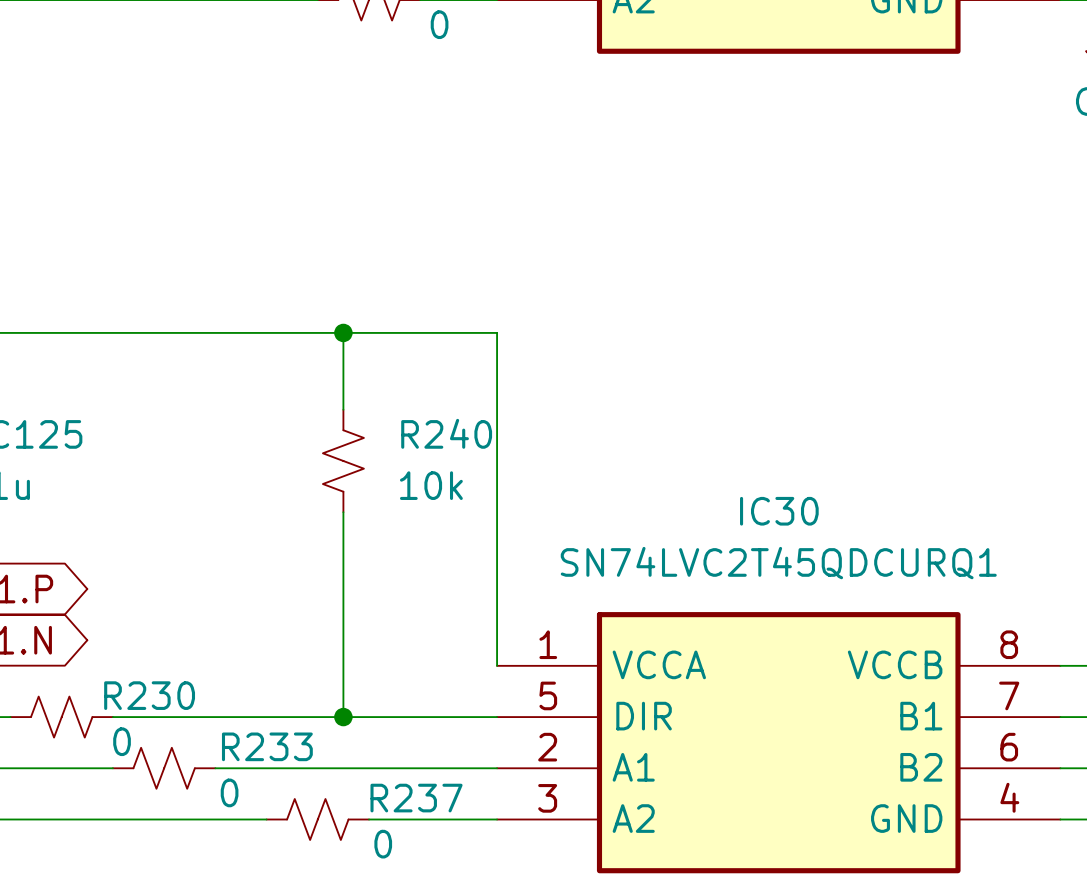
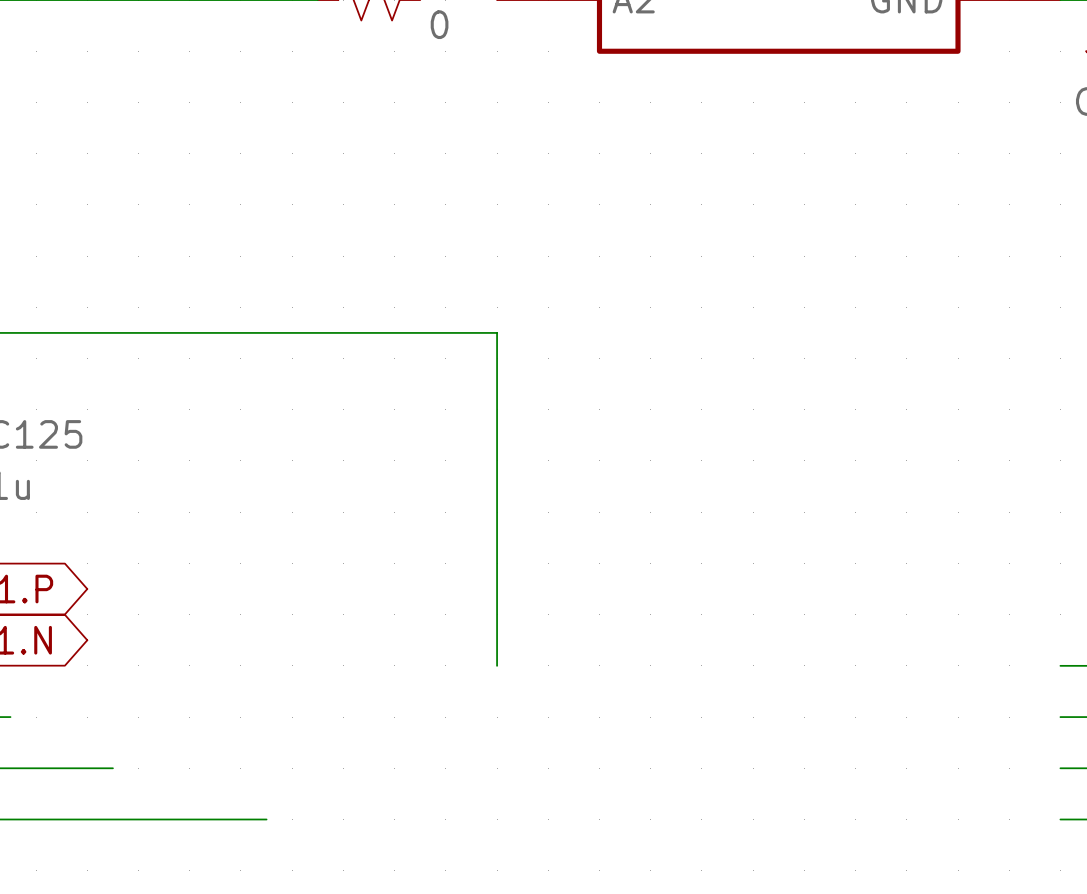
wire: (420, 0) (497, 0) -> none
wire: (343, 332) (343, 409) -> none
junction: (343, 332) -> none
R240: 10k (343, 460) -> none
wire: (343, 512) (343, 717) -> none
R230: 0 (61, 717) -> none
wire: (112, 717) (497, 717) -> none
junction: (343, 717) -> none
IC30: SN74LVC2T45QDCURQ1 (778, 742) -> none
R233: 0 (164, 768) -> none
wire: (215, 768) (497, 768) -> none
R237: 0 (317, 819) -> none
wire: (369, 819) (497, 819) -> none

